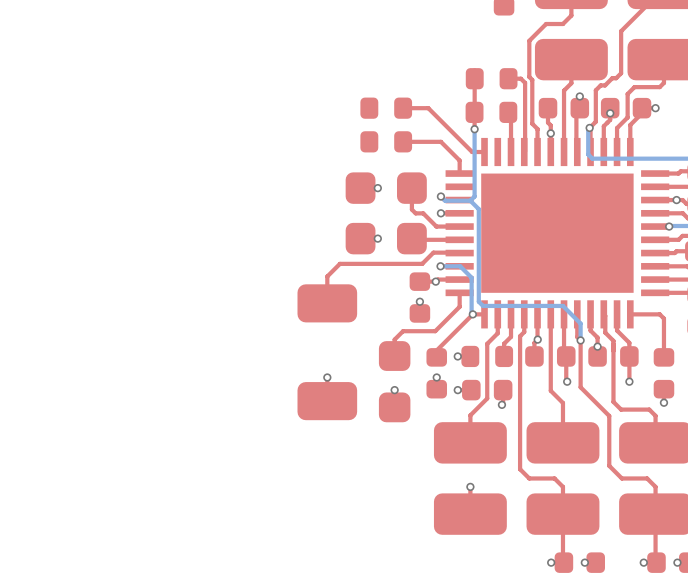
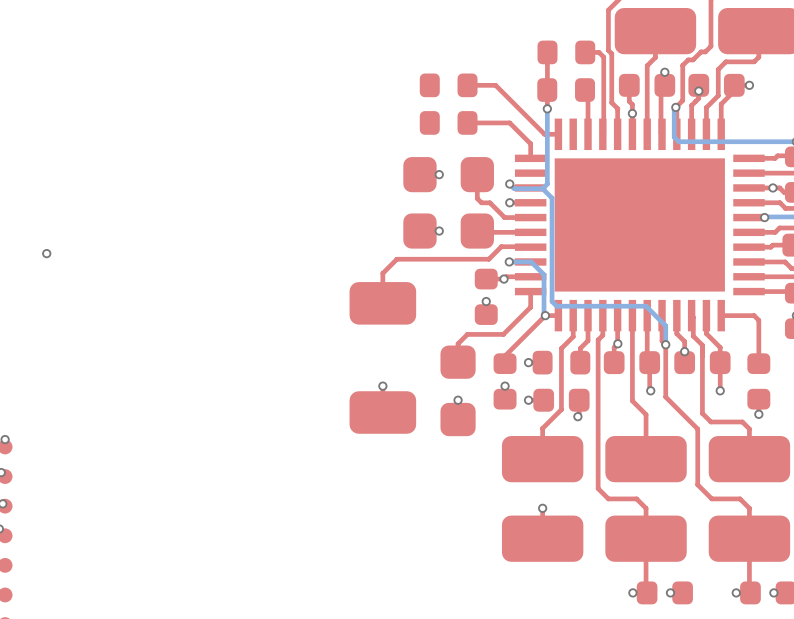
via: none -> (46, 253)

